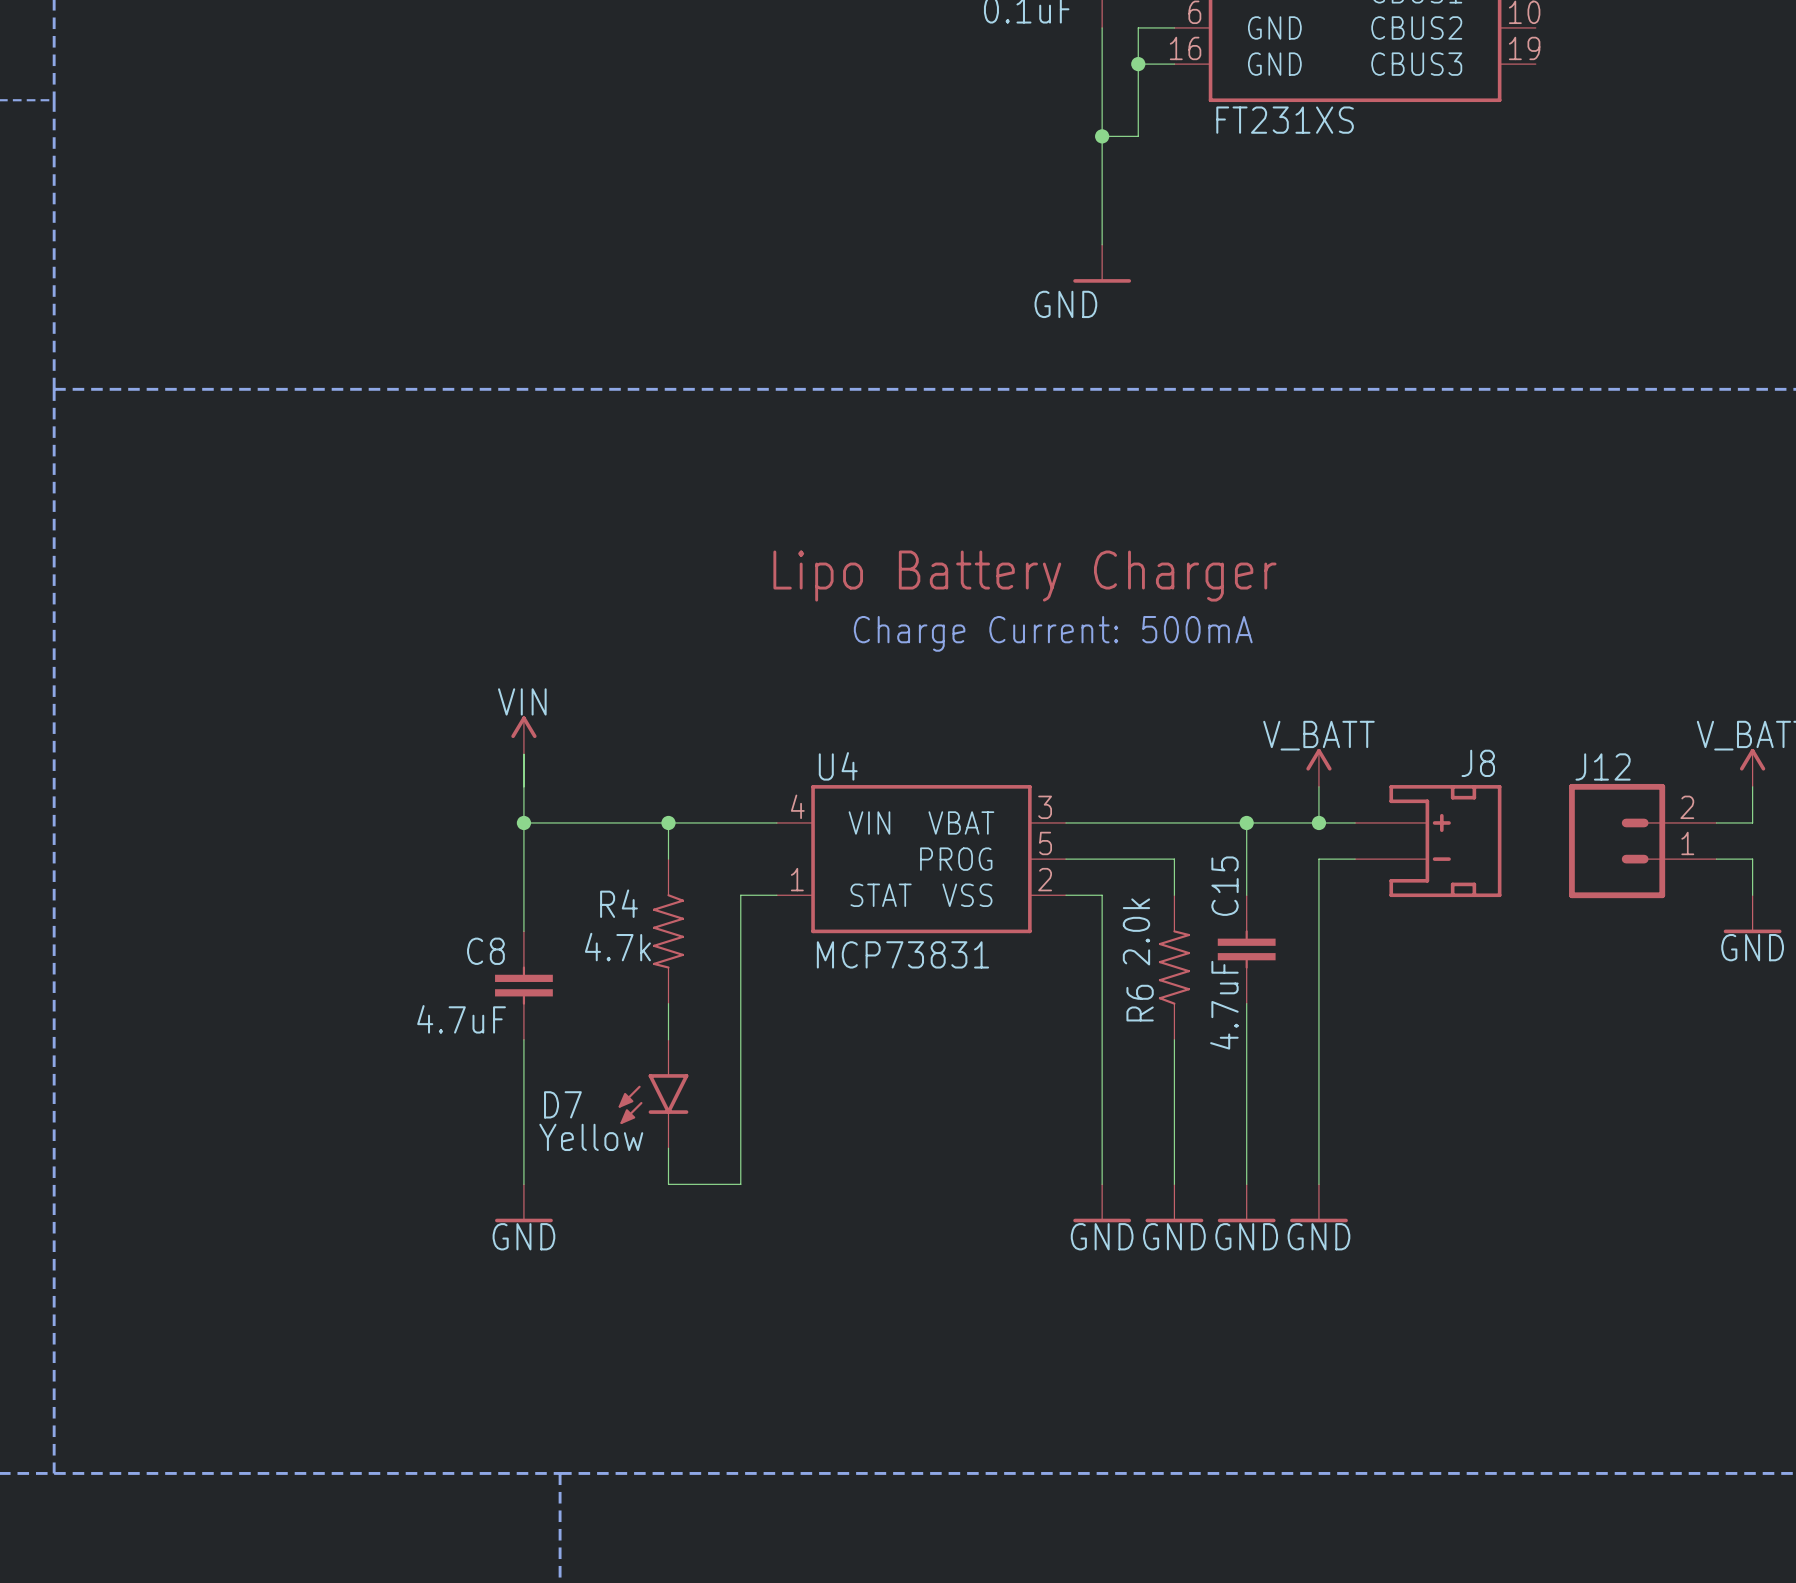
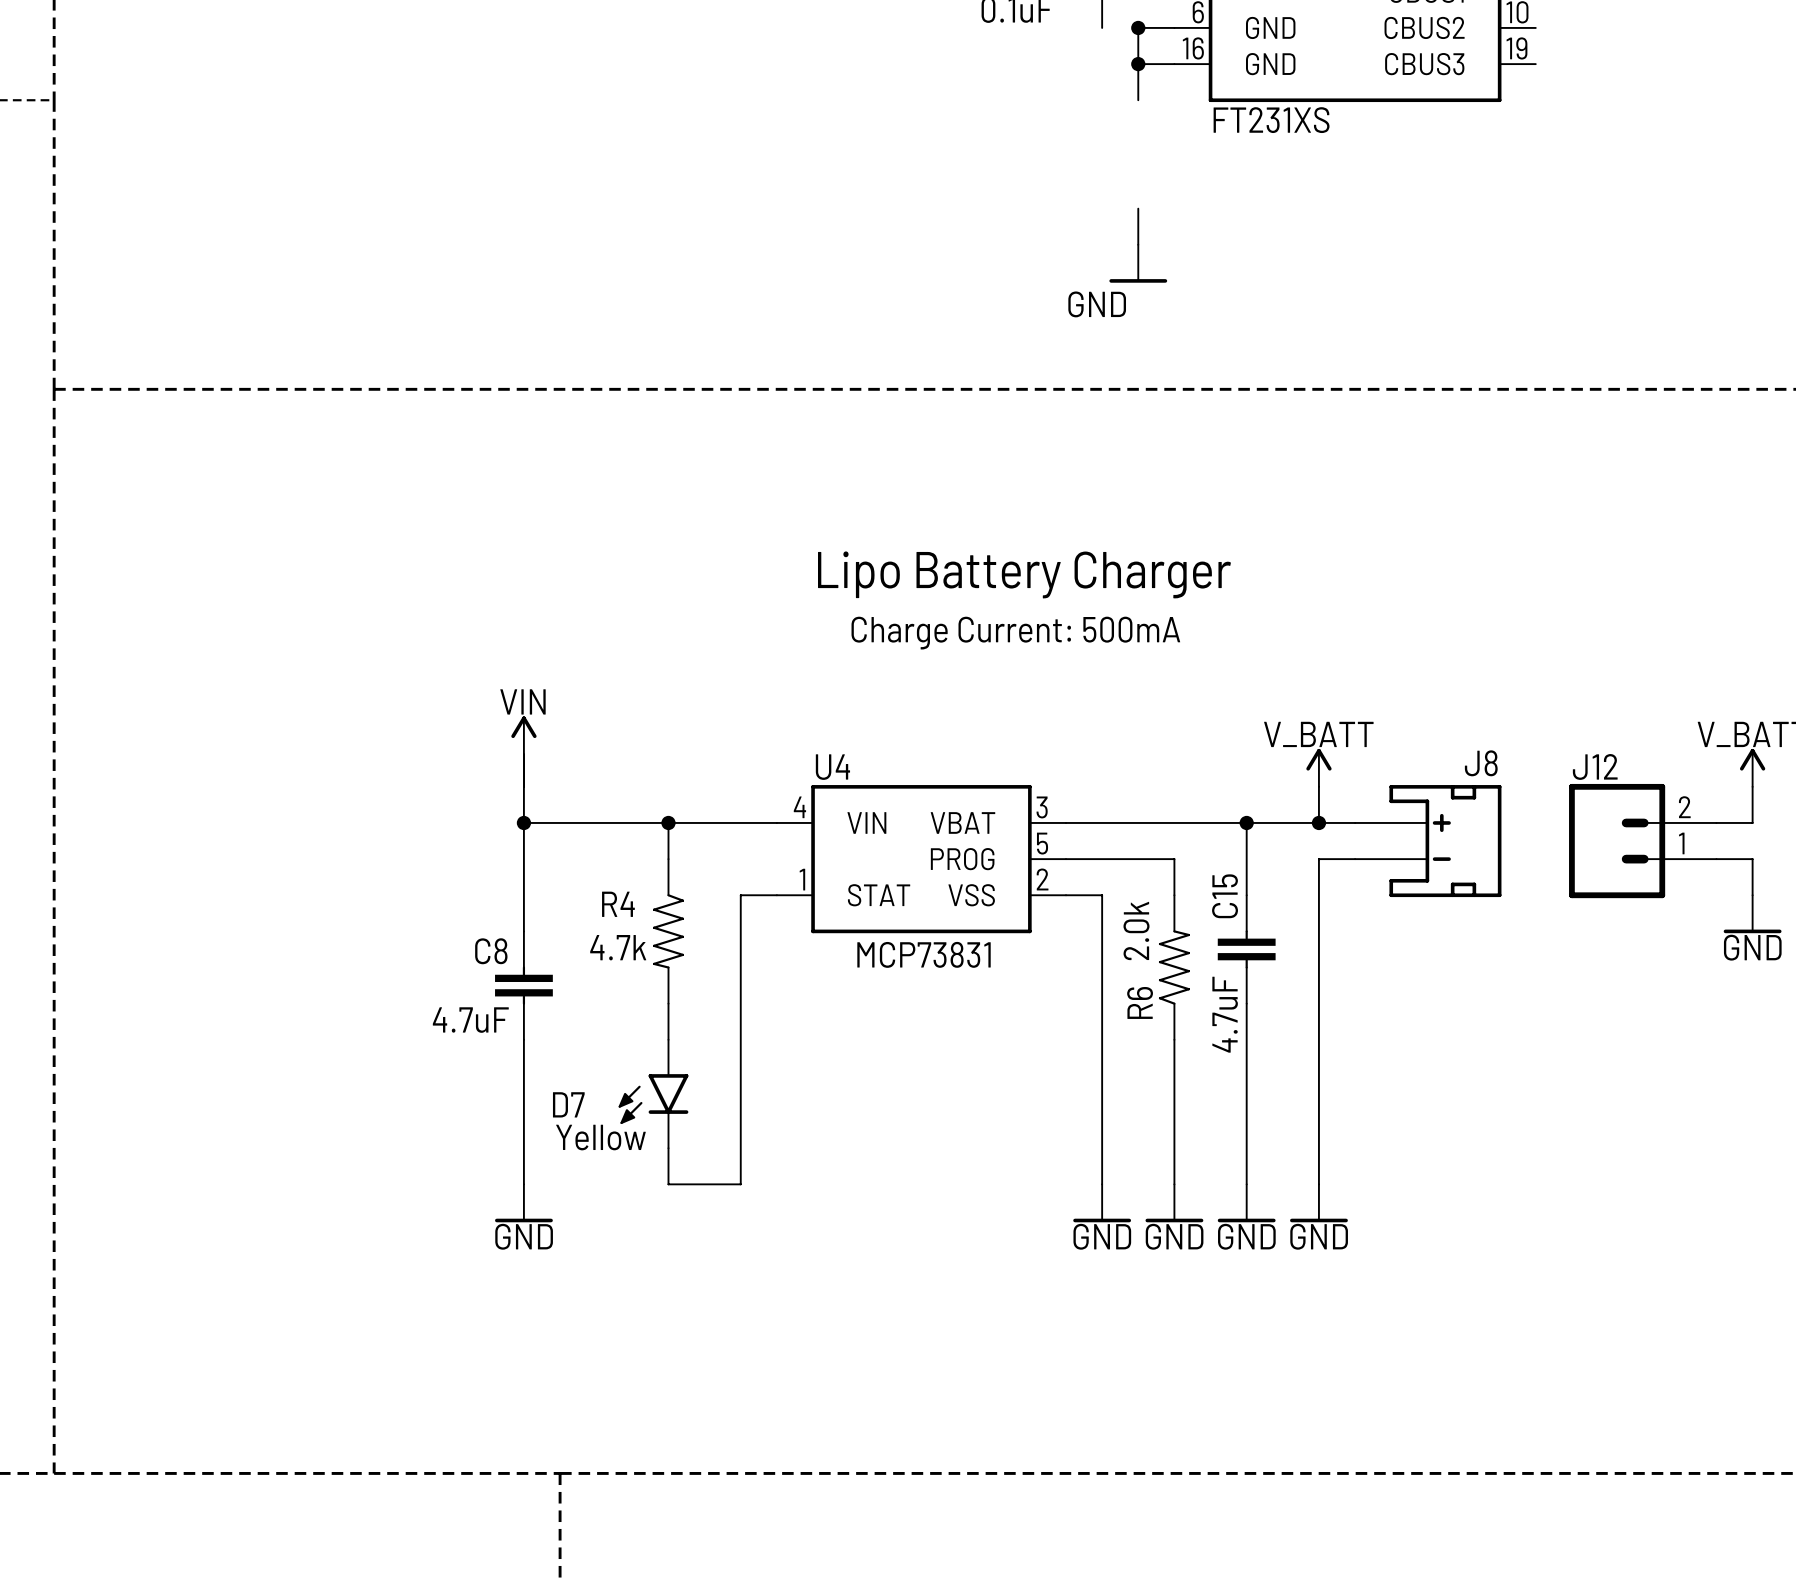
wire: (1102, 27) (1102, 244) -> none
junction: none -> (1138, 27)
wire: (1138, 100) (1138, 136) (1102, 136) -> none
junction: (1102, 136) -> none
wire: none -> (1138, 208) (1138, 244)
power symbol position: GND (1102, 263) -> GND (1138, 263)

